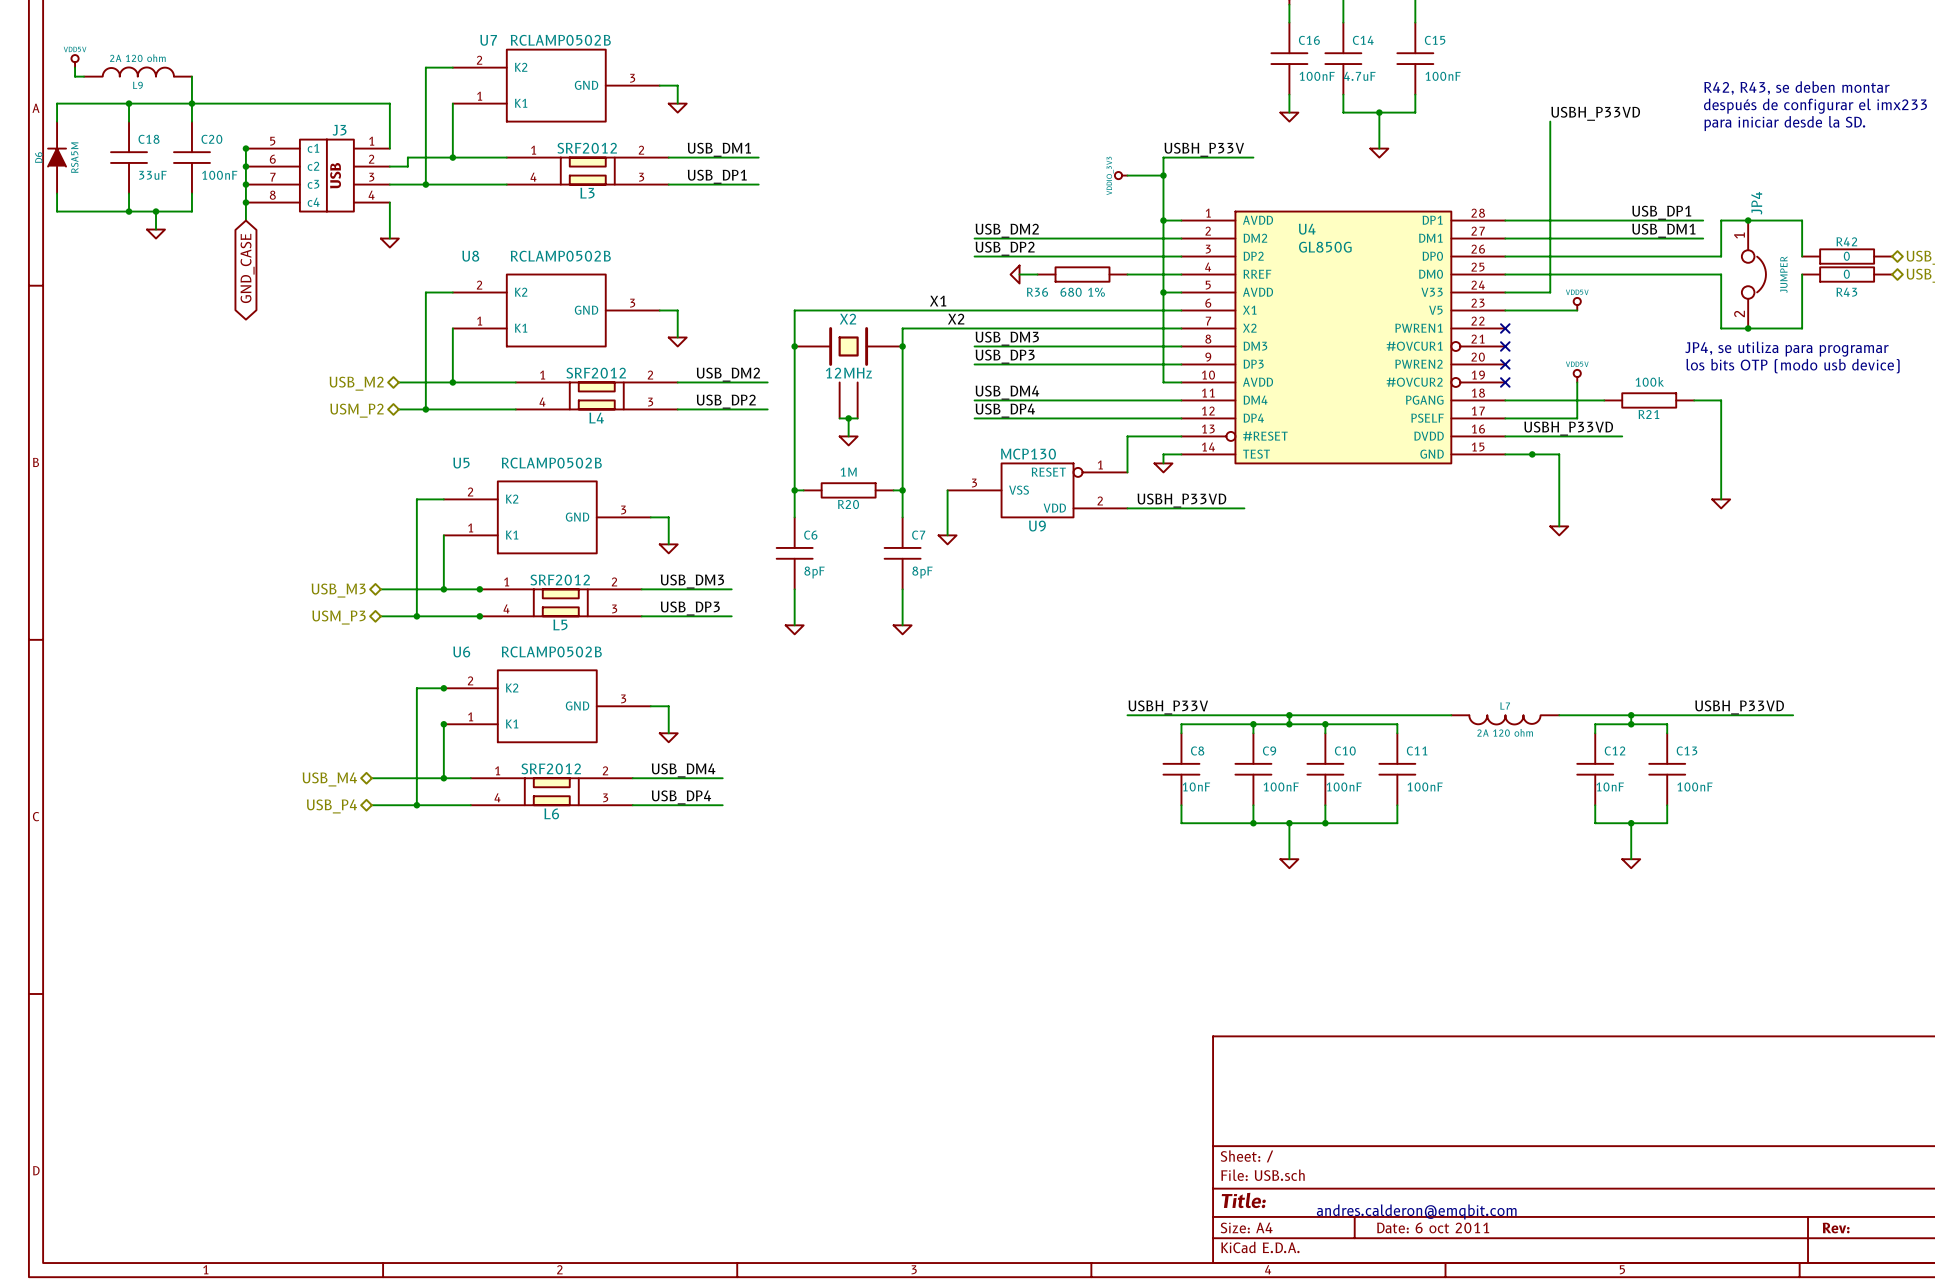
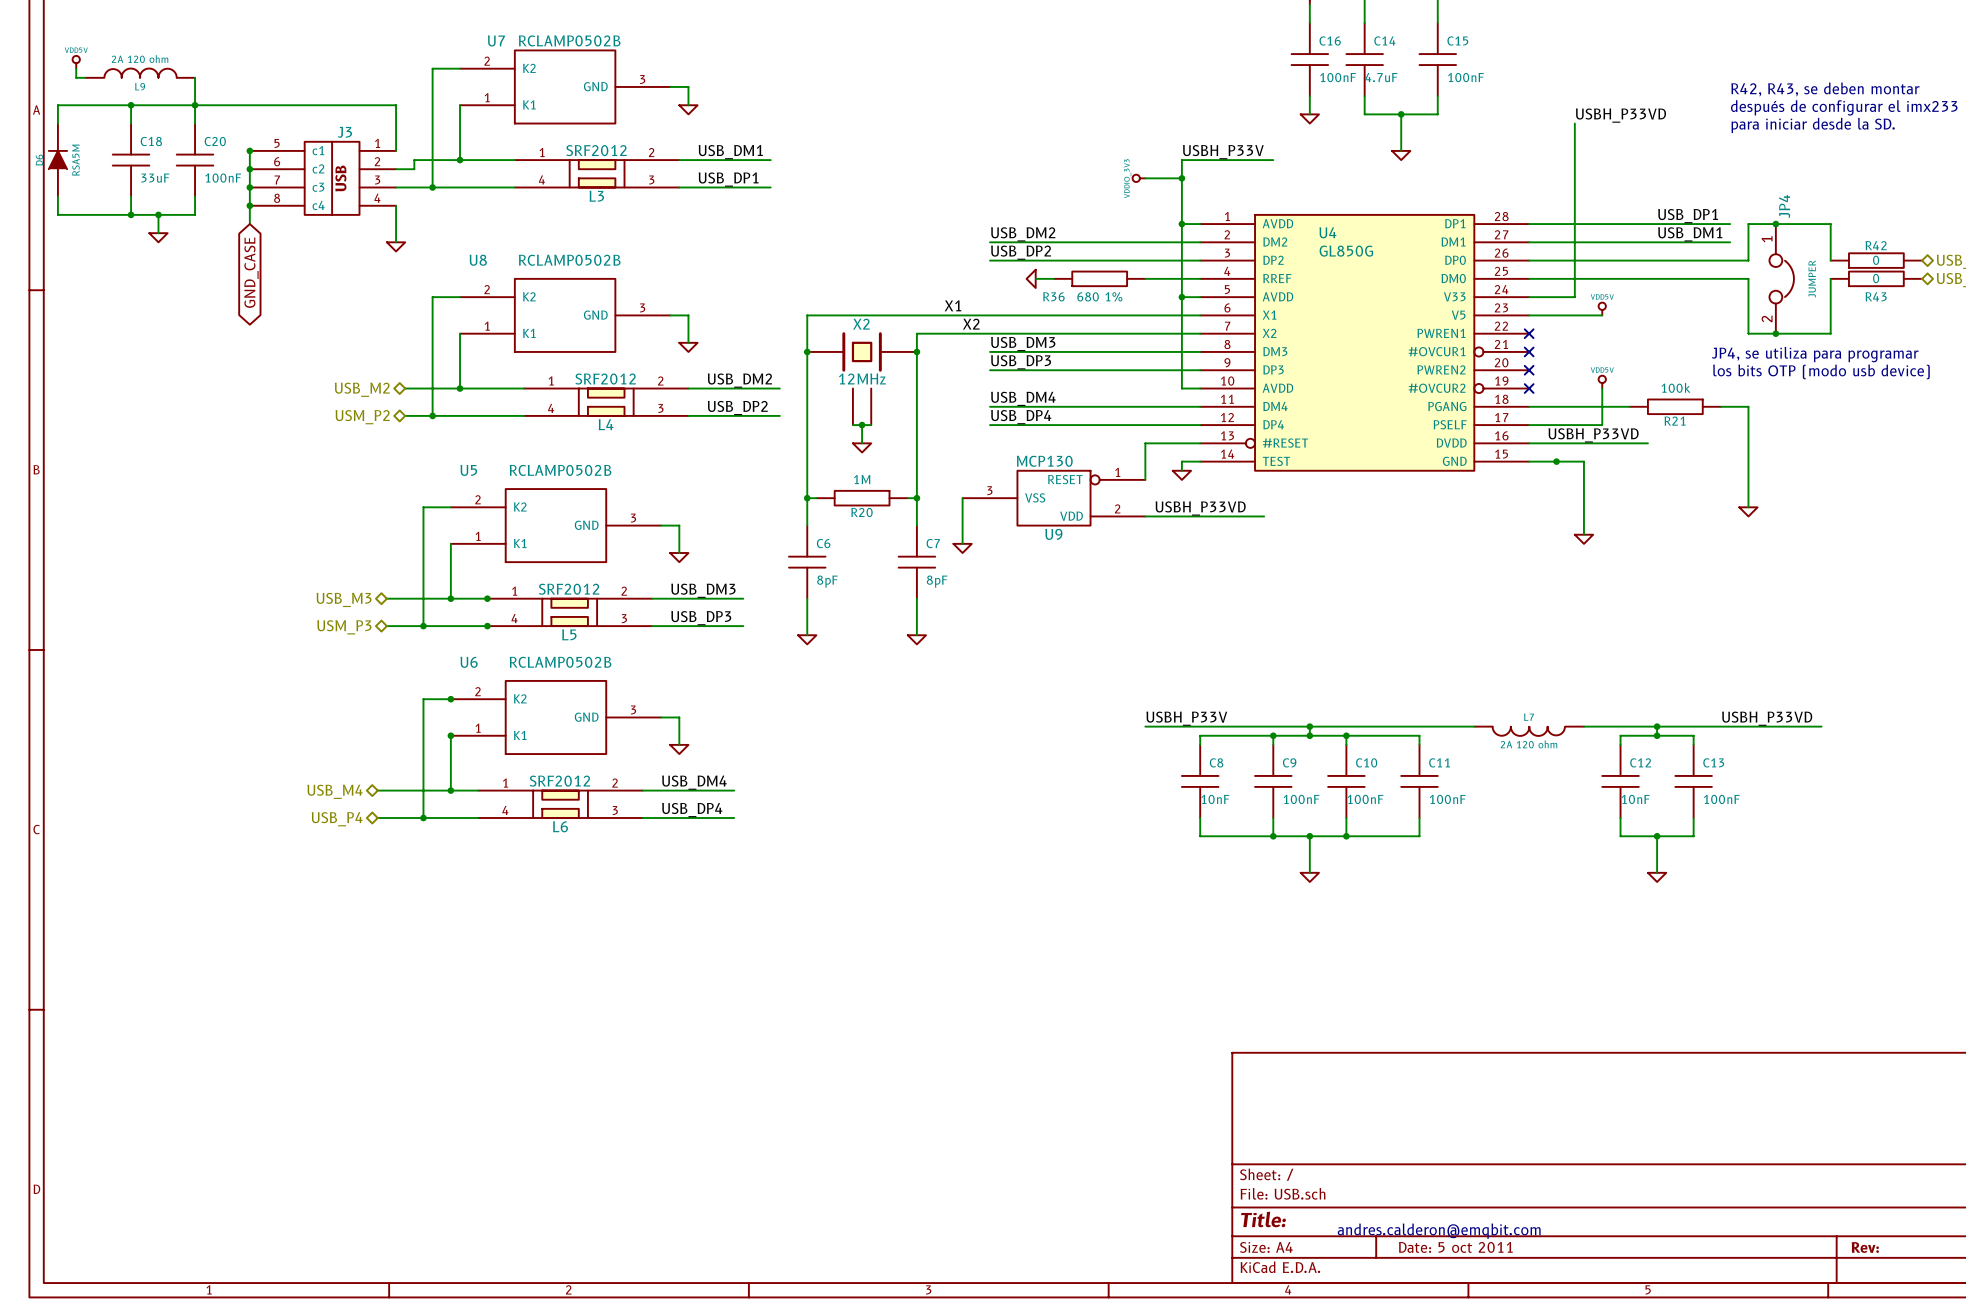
title block: Date: 6 oct 2011 (1433, 1227) -> Date: 5 oct 2011 (1455, 1247)

